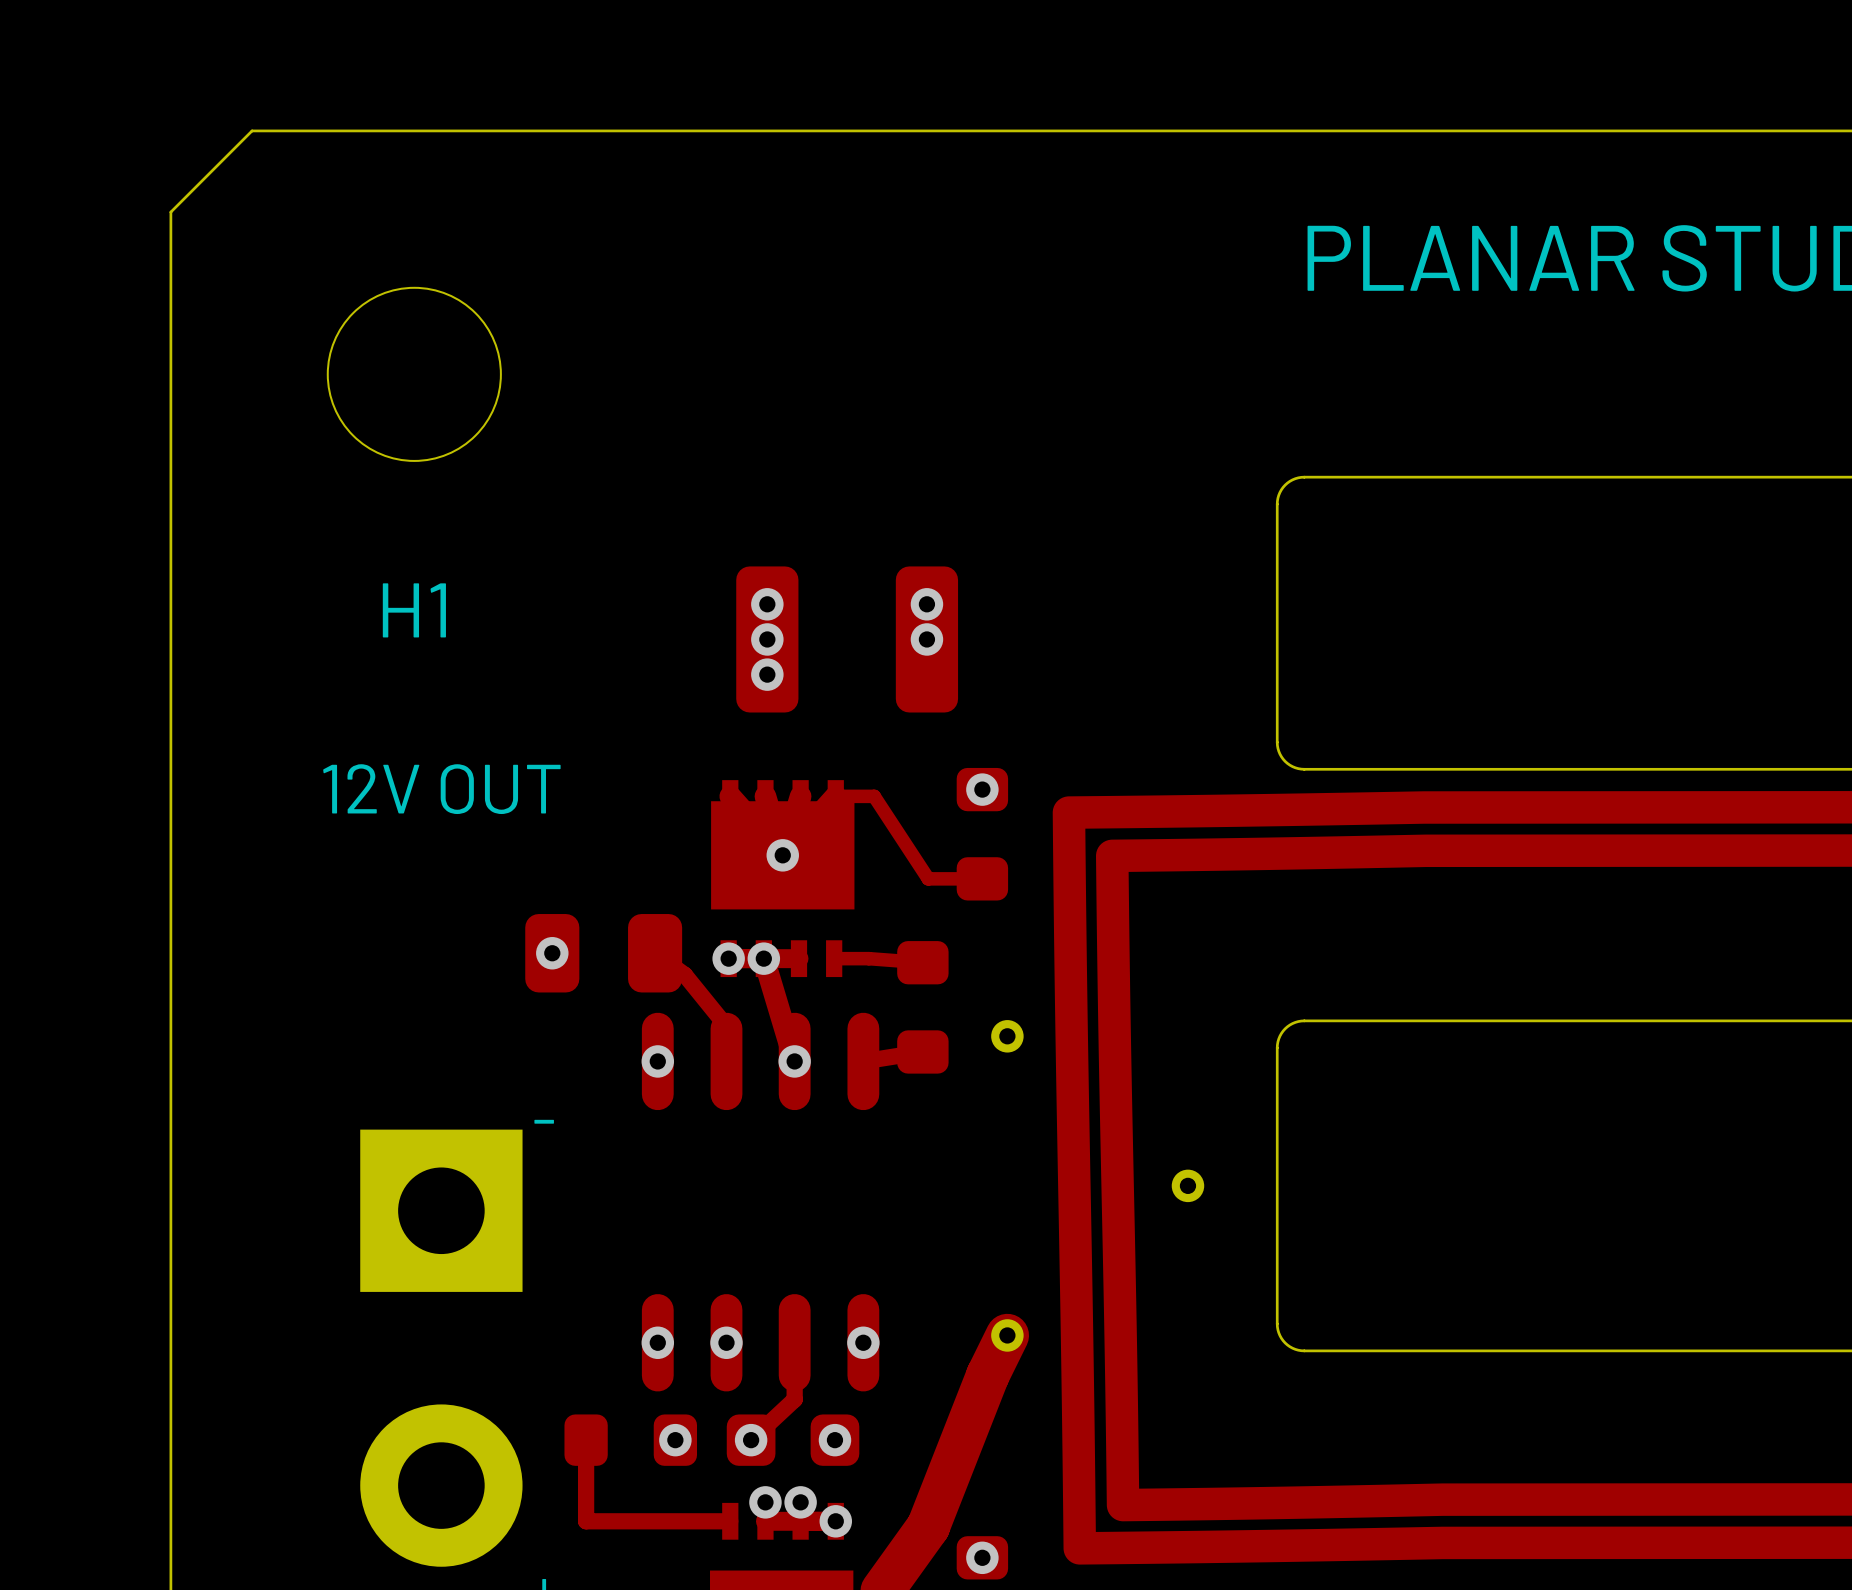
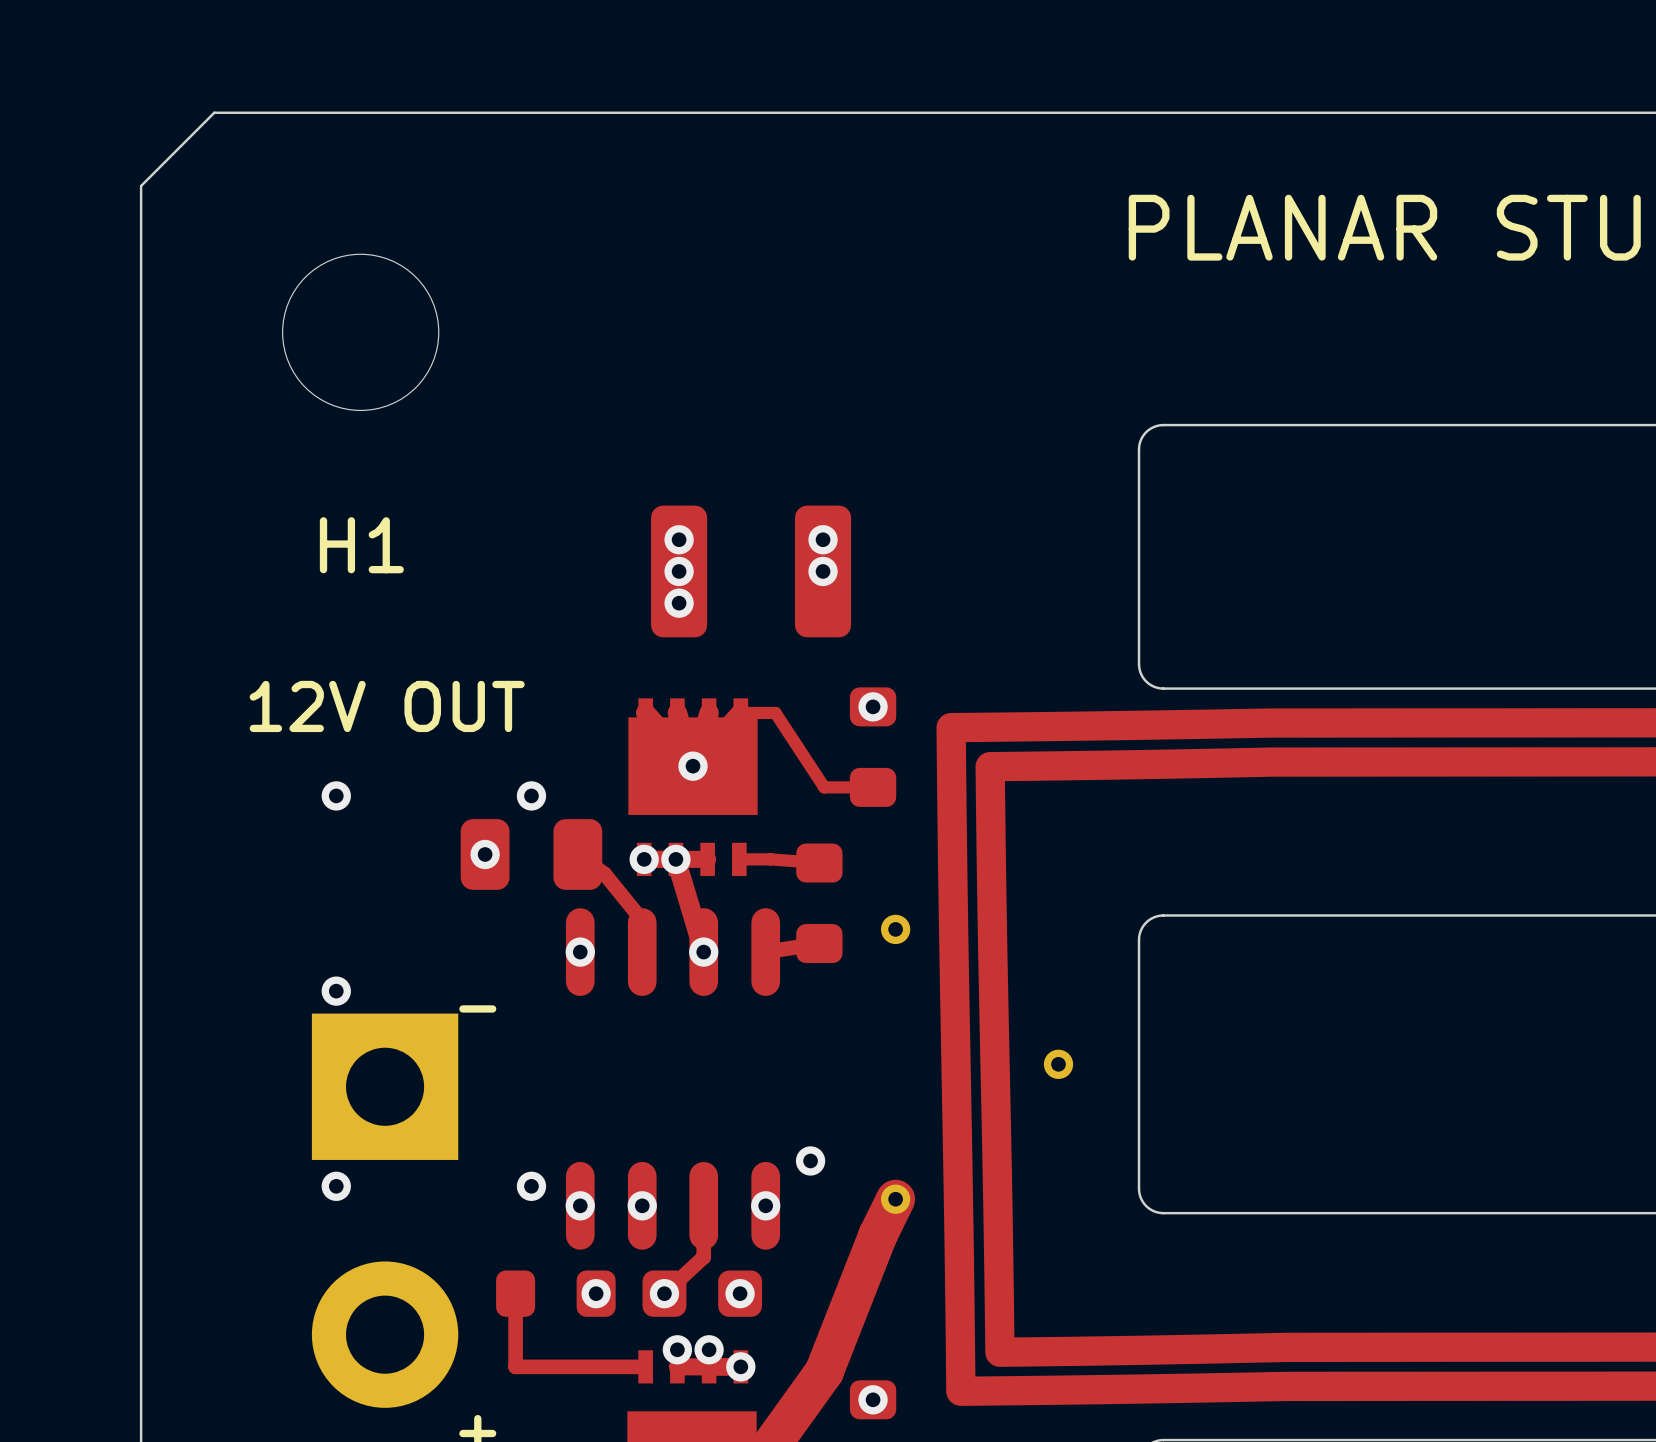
via: none -> (336, 795)
via: none -> (531, 795)
via: none -> (336, 991)
via: none -> (810, 1160)
via: none -> (336, 1186)
via: none -> (531, 1186)

